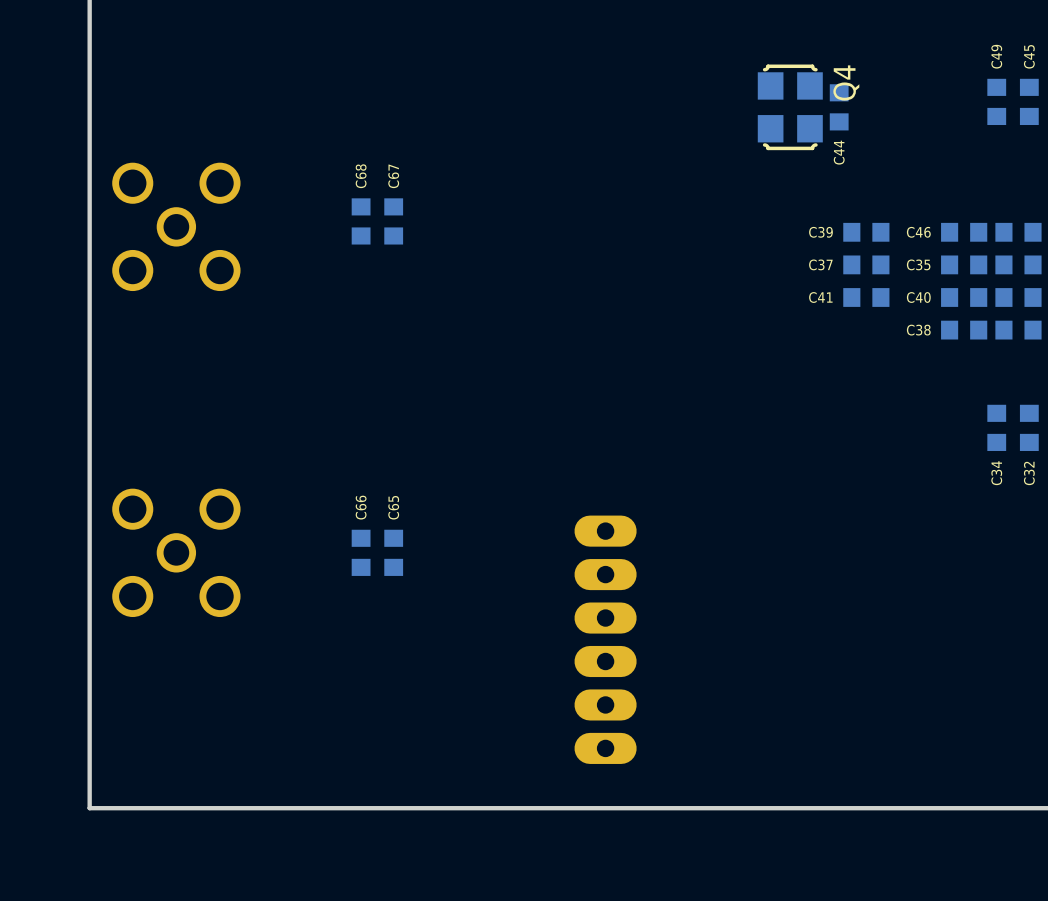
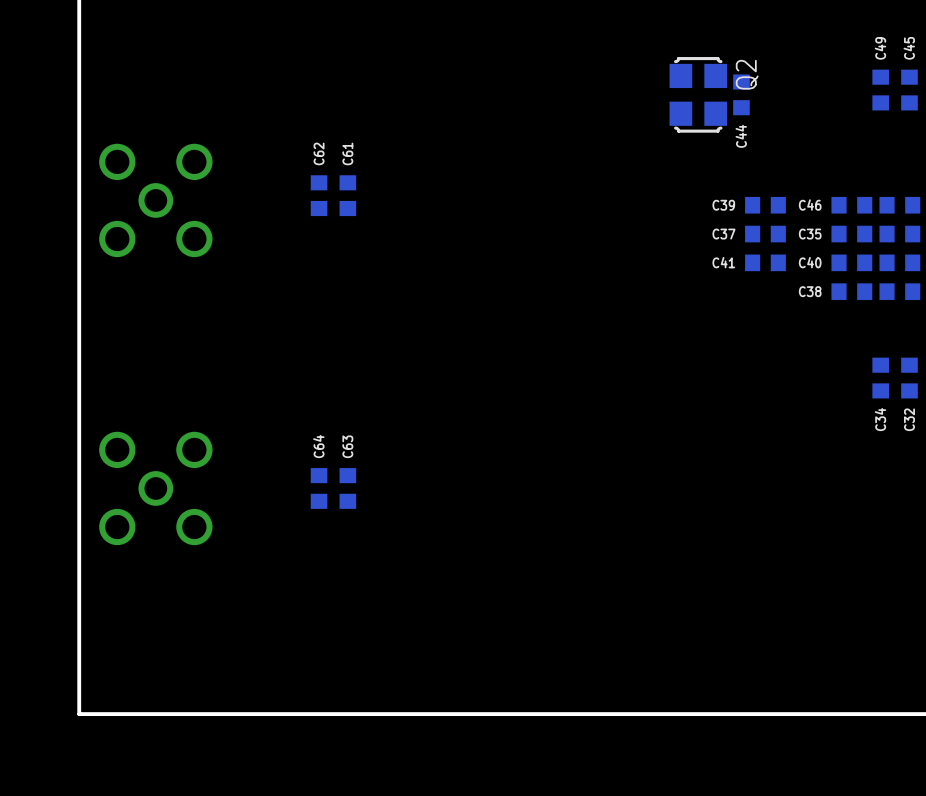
Q4 name: Q4 (846, 82) -> Q2 (747, 74)
C68 name: C68 (361, 176) -> C62 (319, 153)
C67 name: C67 (393, 176) -> C61 (347, 153)
C66 name: C66 (361, 507) -> C64 (318, 446)
C65 name: C65 (393, 507) -> C63 (347, 446)
part: (605, 639) -> none

